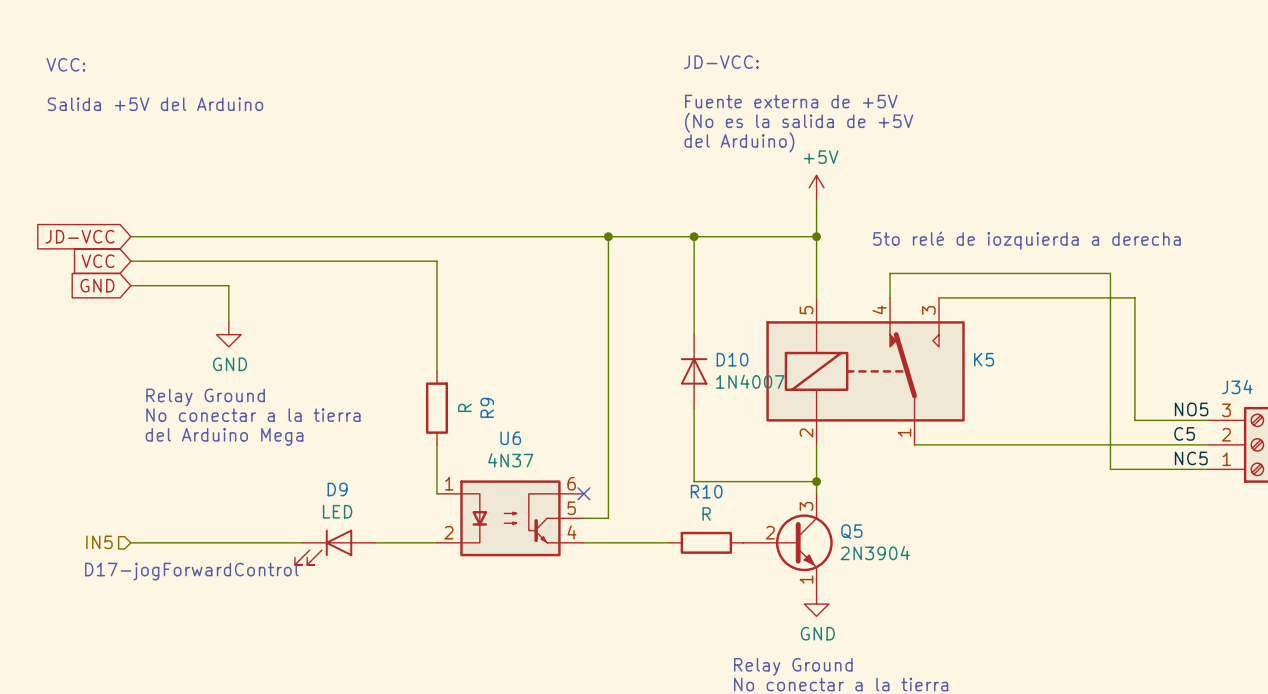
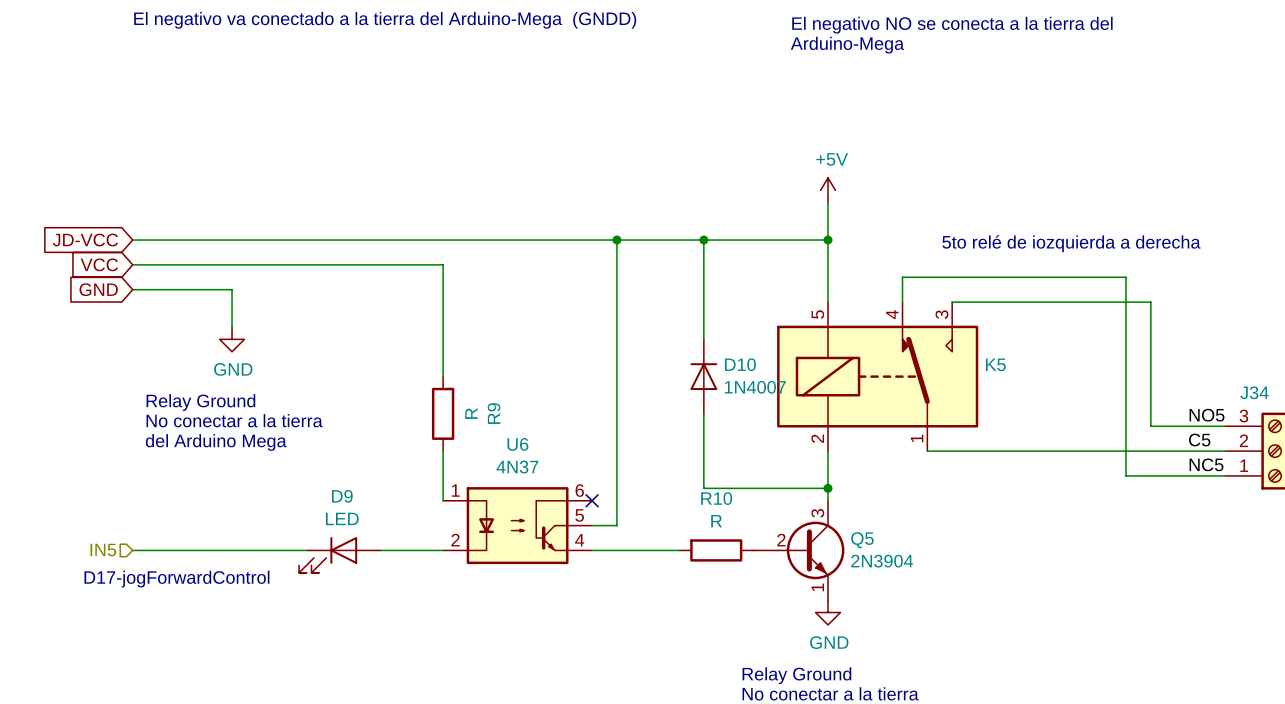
text: none -> El negativo va conectado a la tierra del Arduino-Mega (GNDD) (385, 20)
text: none -> El negativo NO se conecta a la tierra del (952, 25)
text: none -> Arduino-Mega (847, 45)
text: JD-VCC: (721, 62) -> none
text: VCC: (65, 64) -> none
text: Fuente externa de +5V (791, 101) -> none
text: Salida +5V del Arduino (155, 104) -> none
text: (No es la salida de +5V (799, 122) -> none
text: del Arduino) (739, 142) -> none

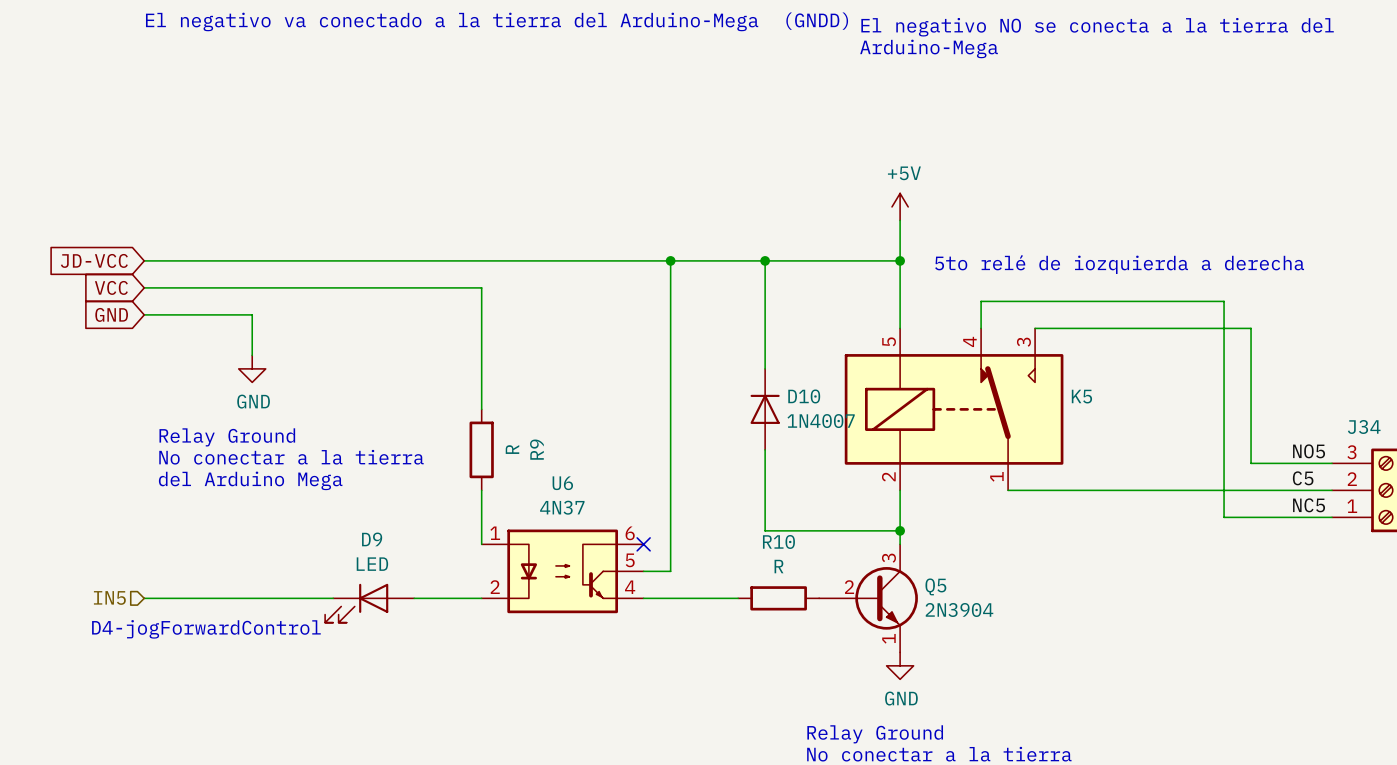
text: D17-jogForwardControl (176, 579) -> D4-jogForwardControl (206, 629)

